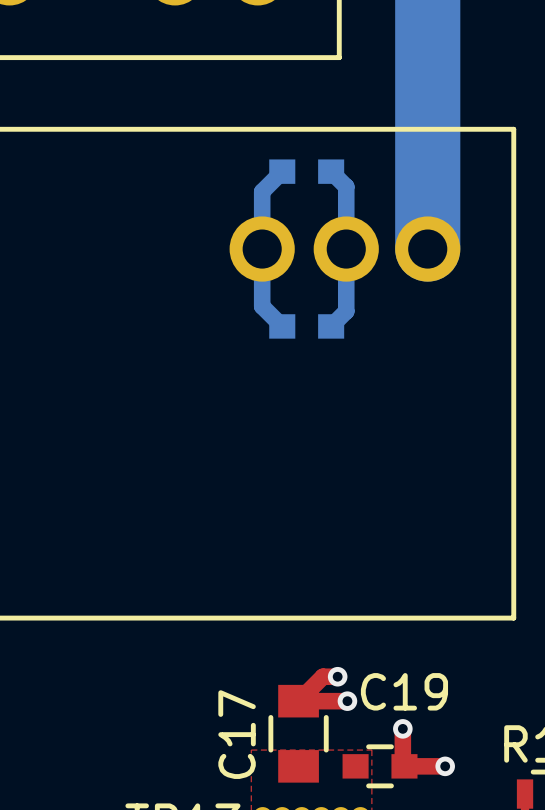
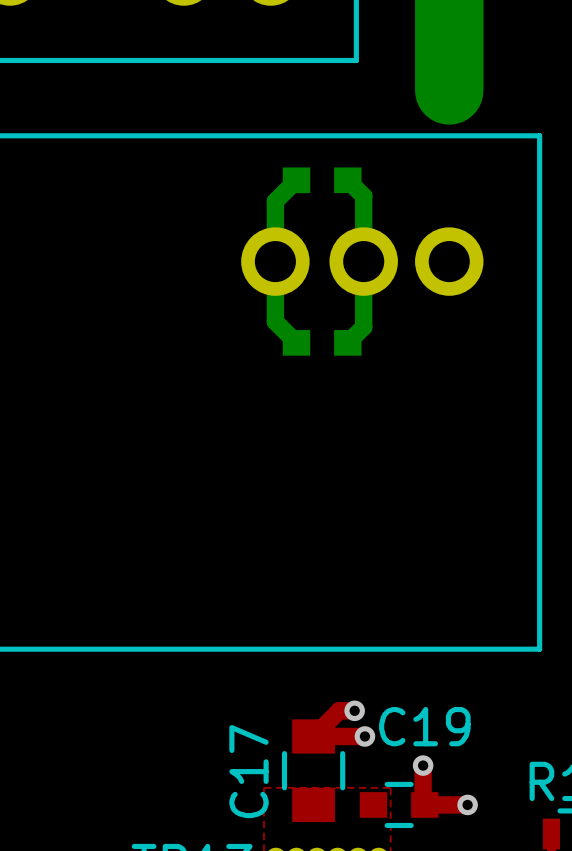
bottom track: (427, 86) (427, 249) -> none

